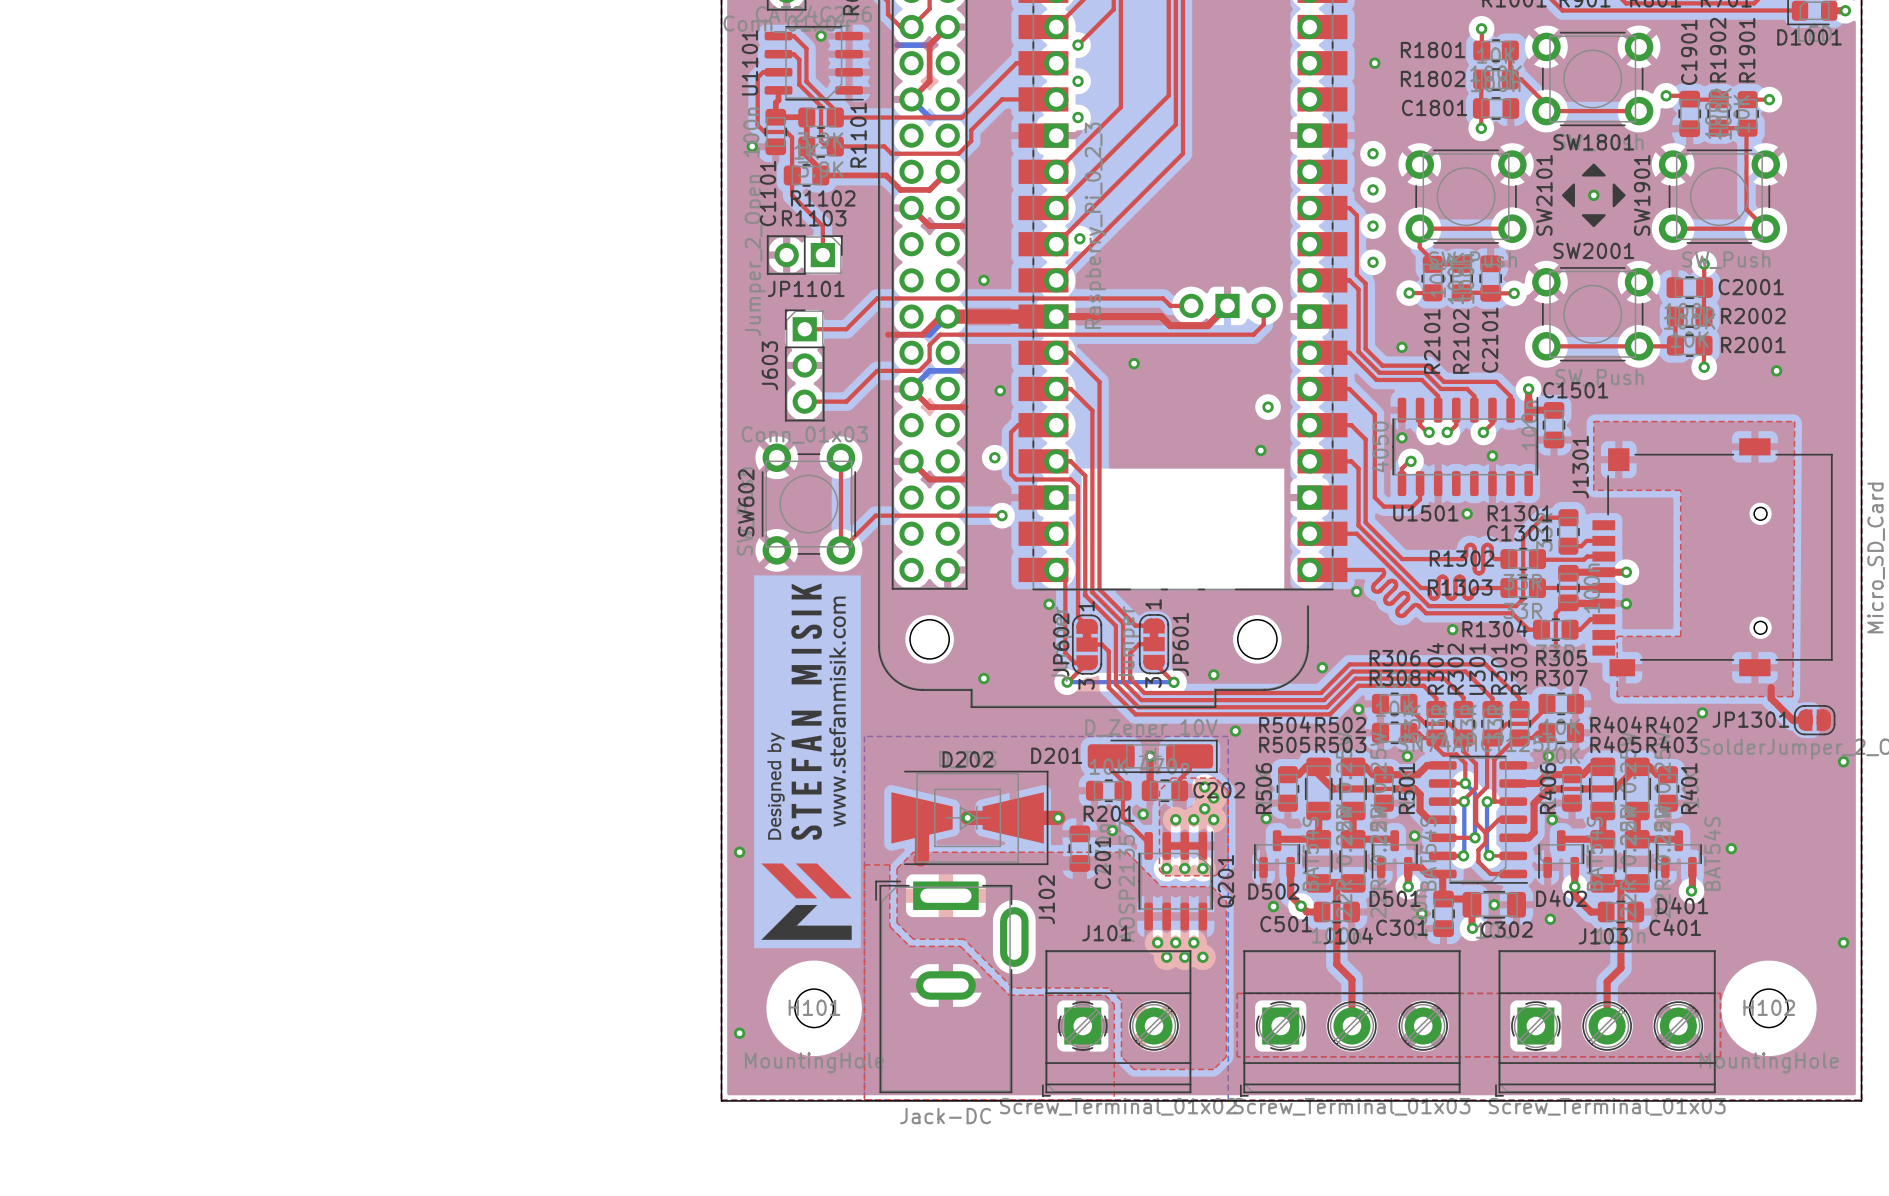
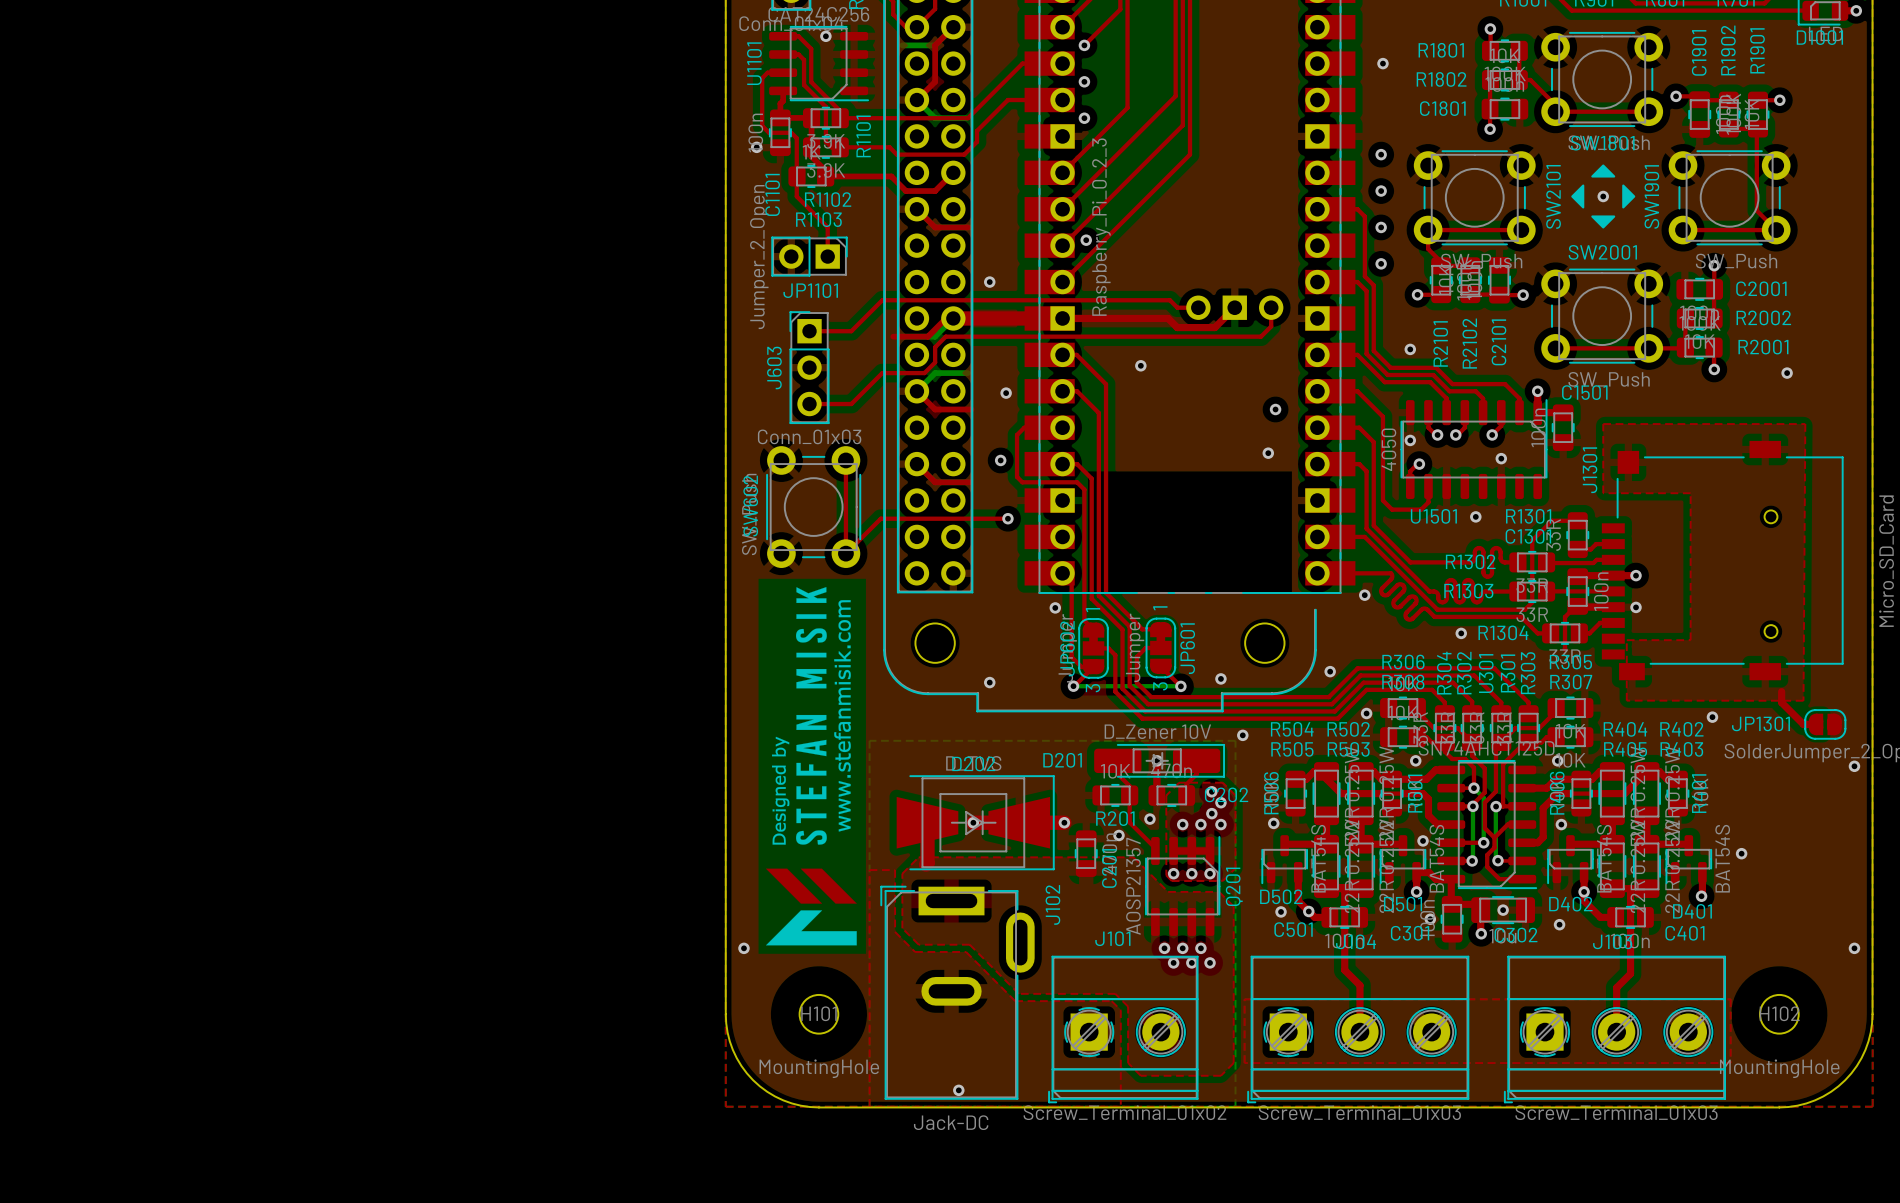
via: (739, 852) -> none
via: none -> (743, 948)
board edge: (721, 1008) (721, 1100) (814, 1100) -> (725, 1014) (727, 1032) (732, 1049) (741, 1066) (753, 1080) (767, 1091) (783, 1100) (800, 1105) (818, 1107)
board edge: (1861, 1008) (1861, 1100) (1768, 1100) -> (1872, 1014) (1870, 1032) (1865, 1049) (1856, 1066) (1845, 1080) (1831, 1091) (1815, 1100) (1797, 1105) (1779, 1107)
via: (739, 1033) -> none
via: none -> (958, 1090)

